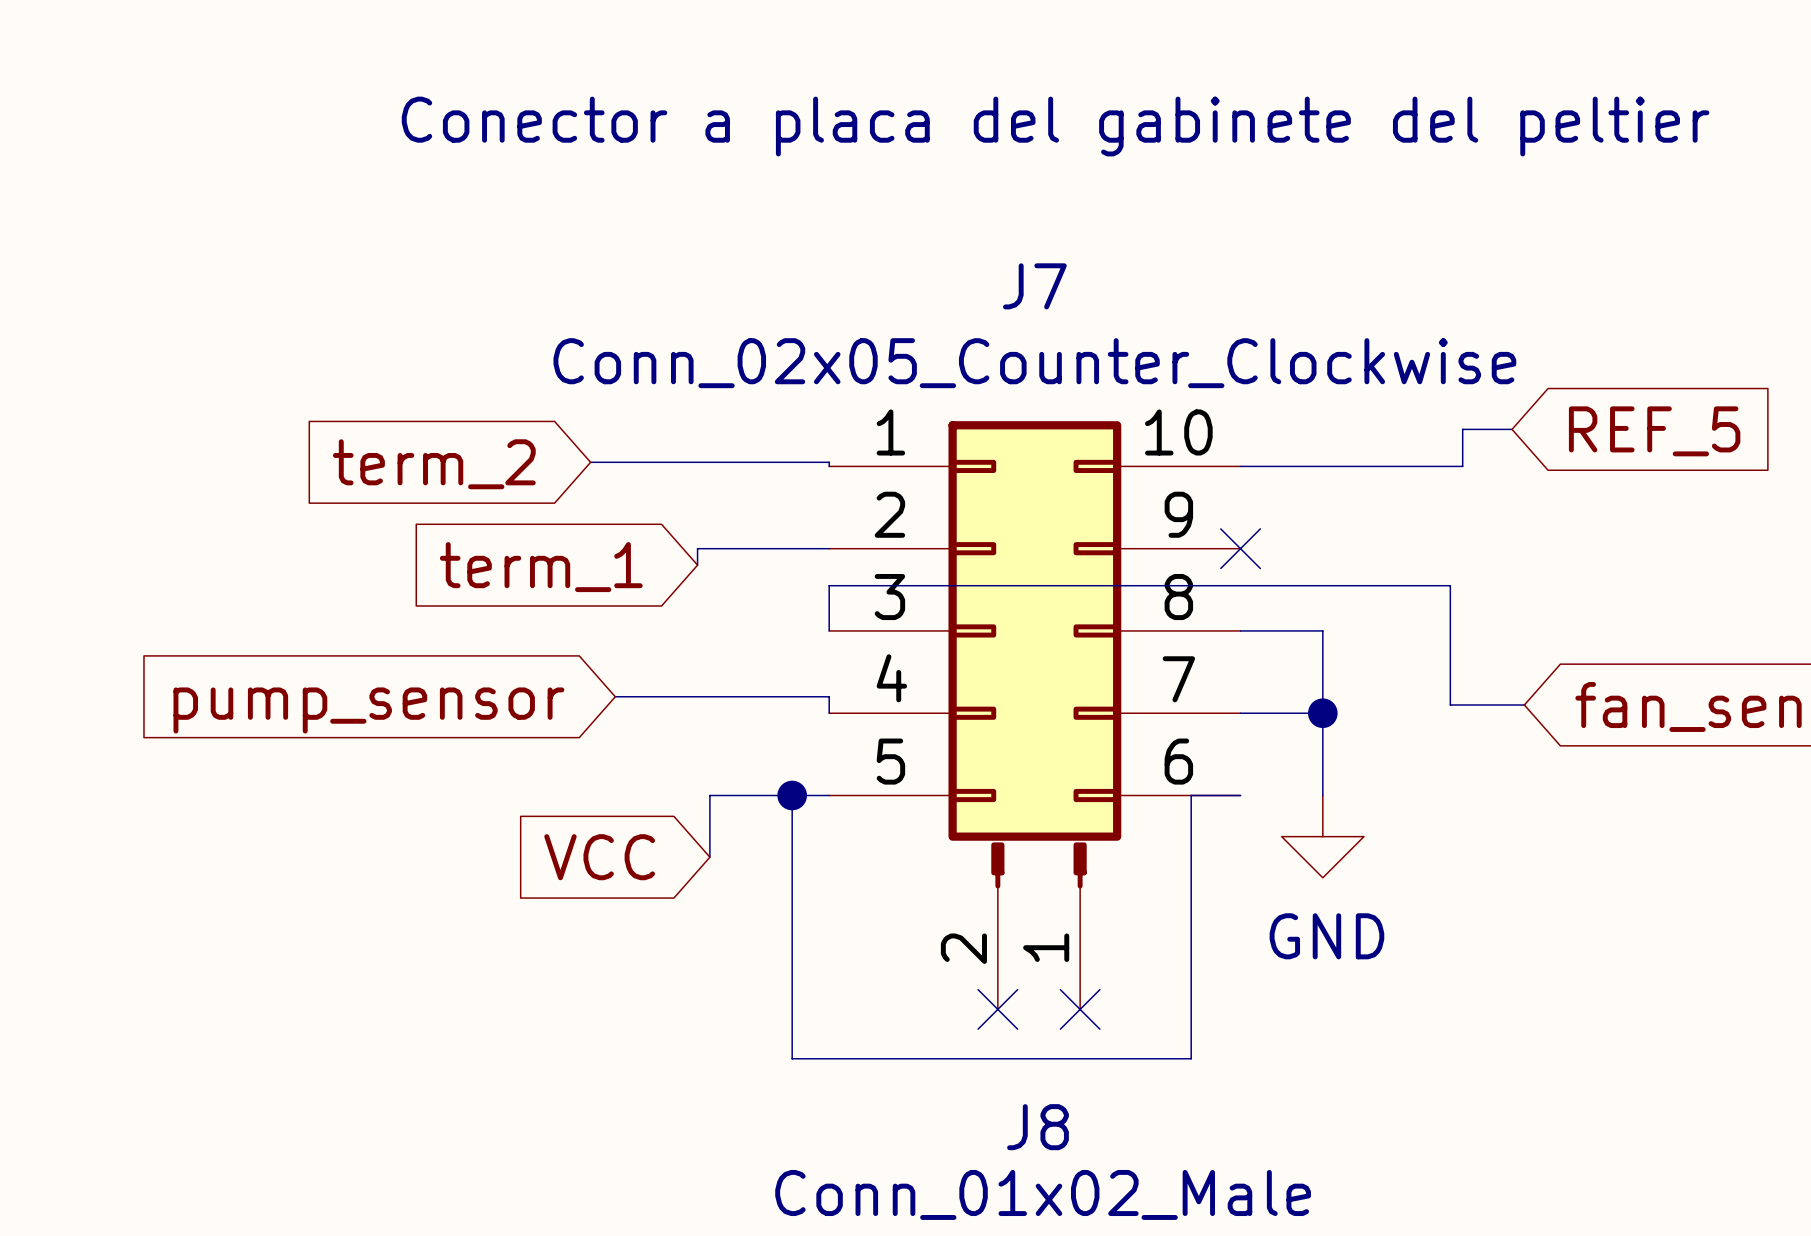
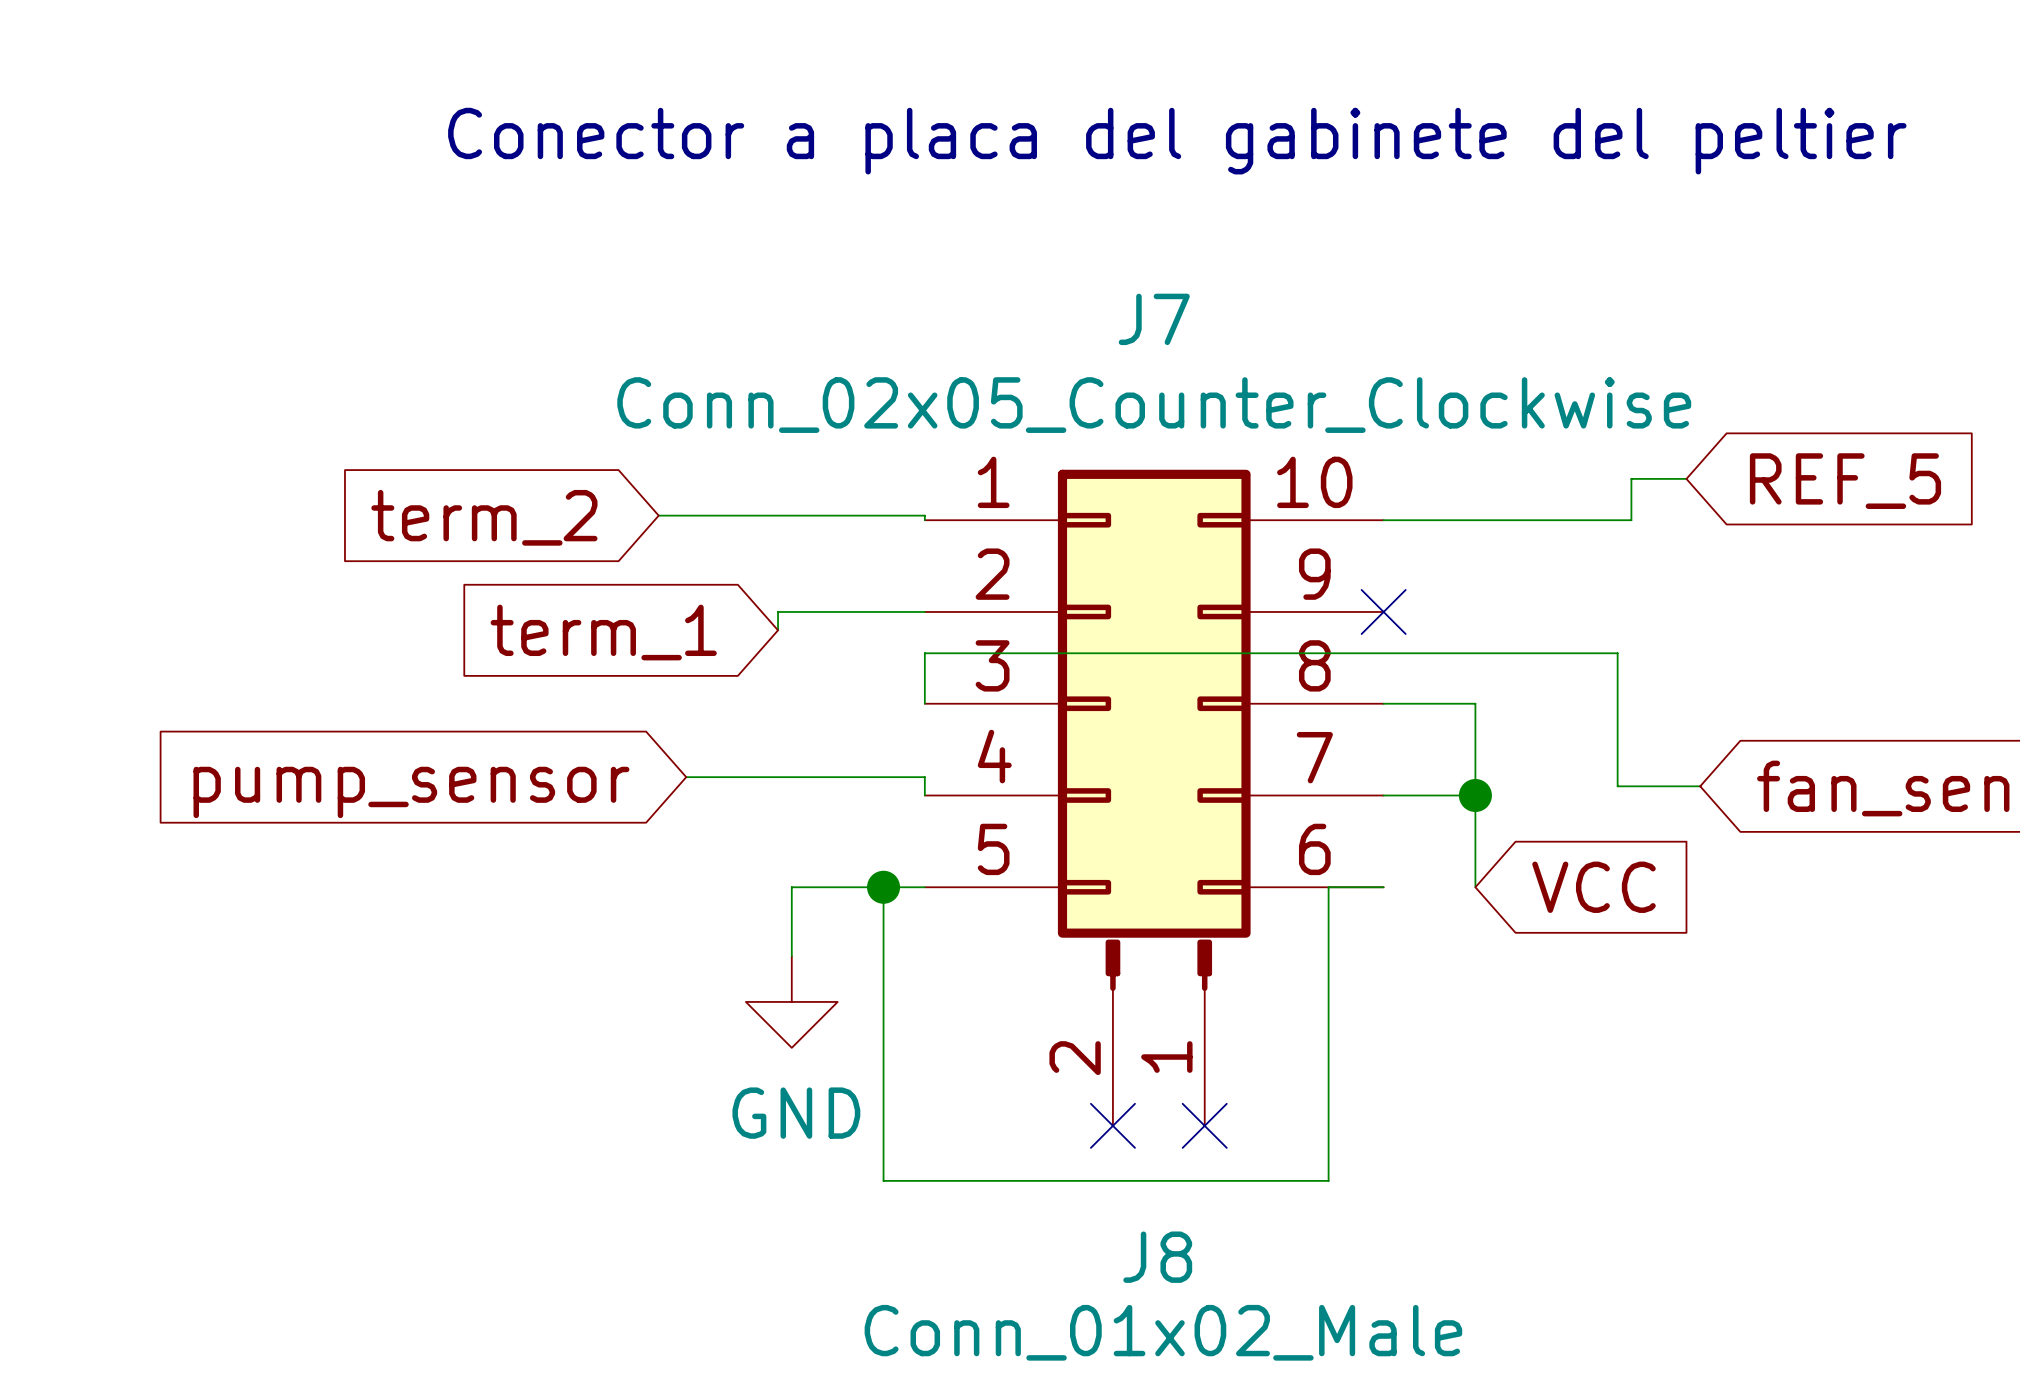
power symbol position: GND (1322, 836) -> GND (791, 1001)
global label rotation: 0° (599, 857) -> 180° (1594, 887)
global label position: VCC (599, 857) -> VCC (1594, 887)

